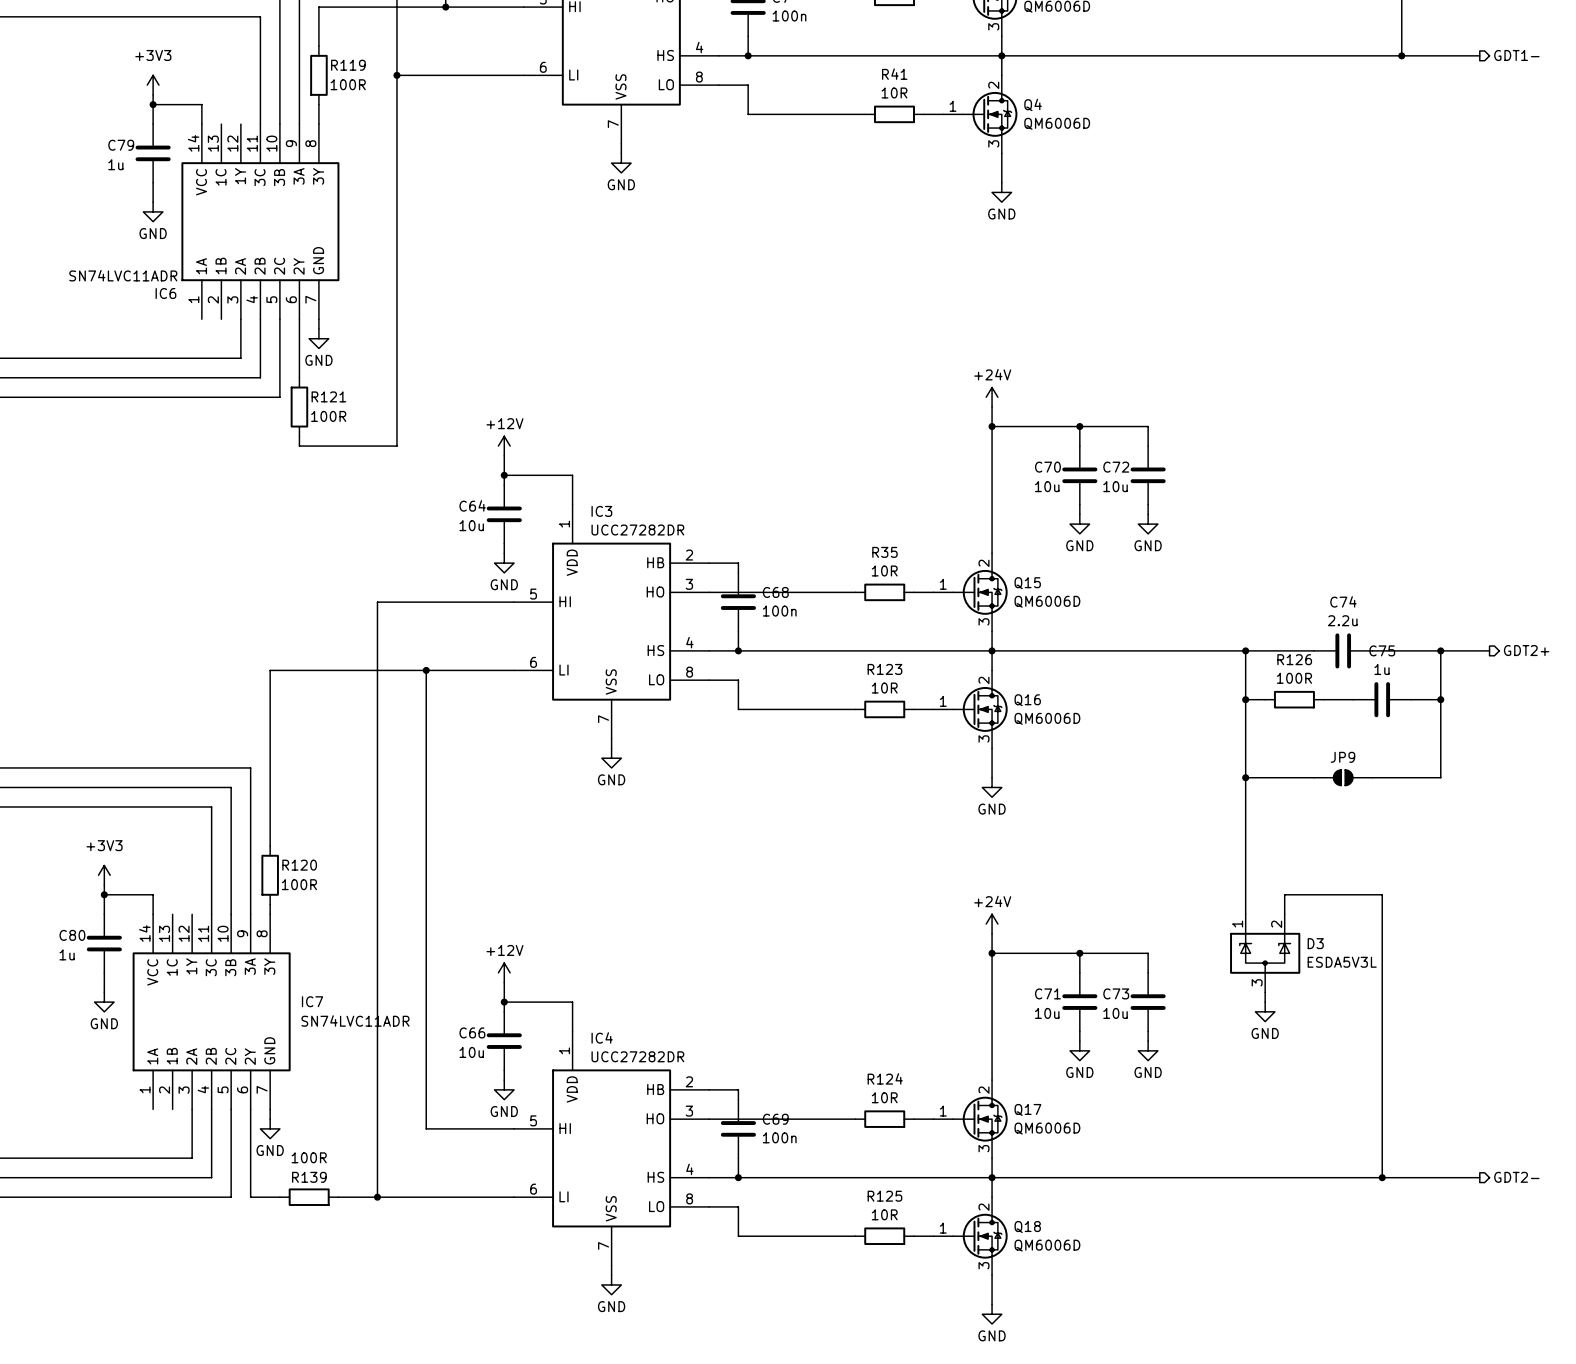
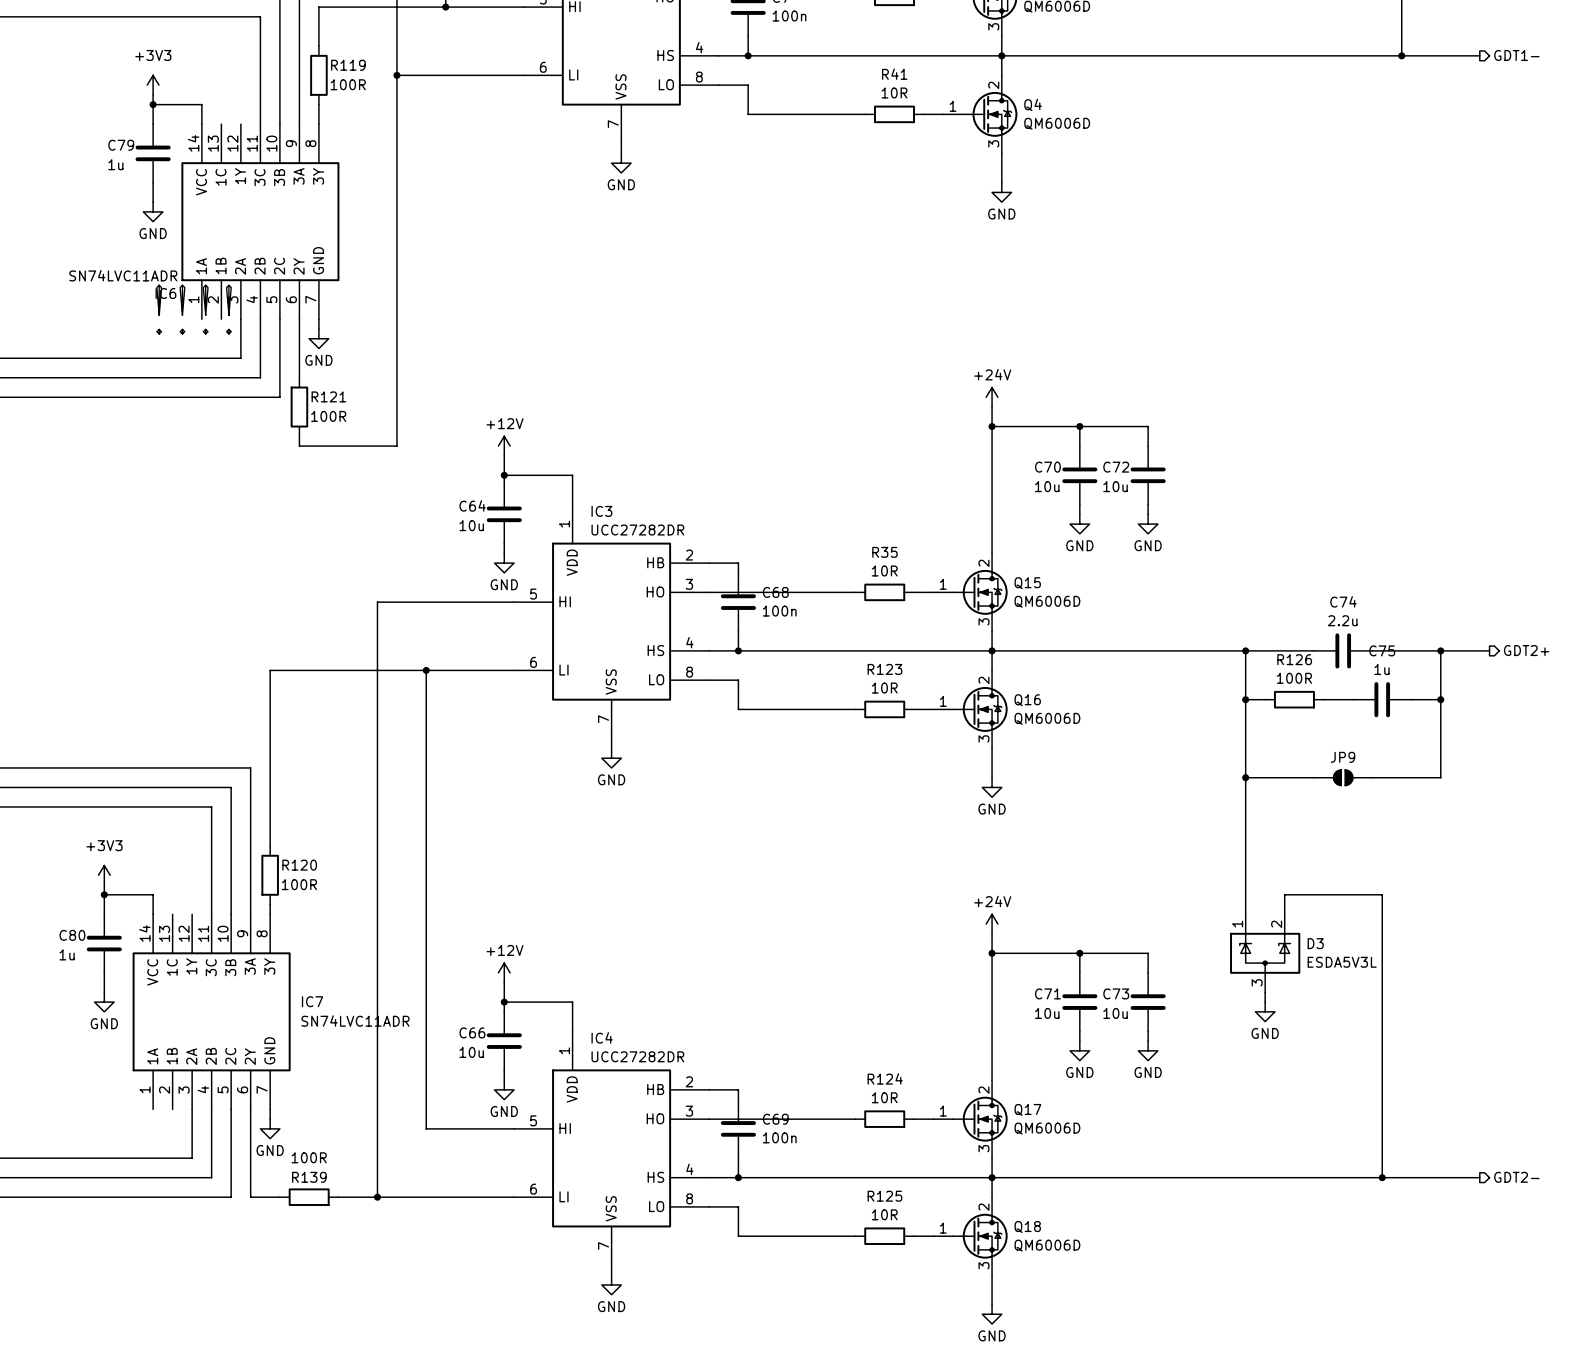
text: none -> !!!! (194, 309)

